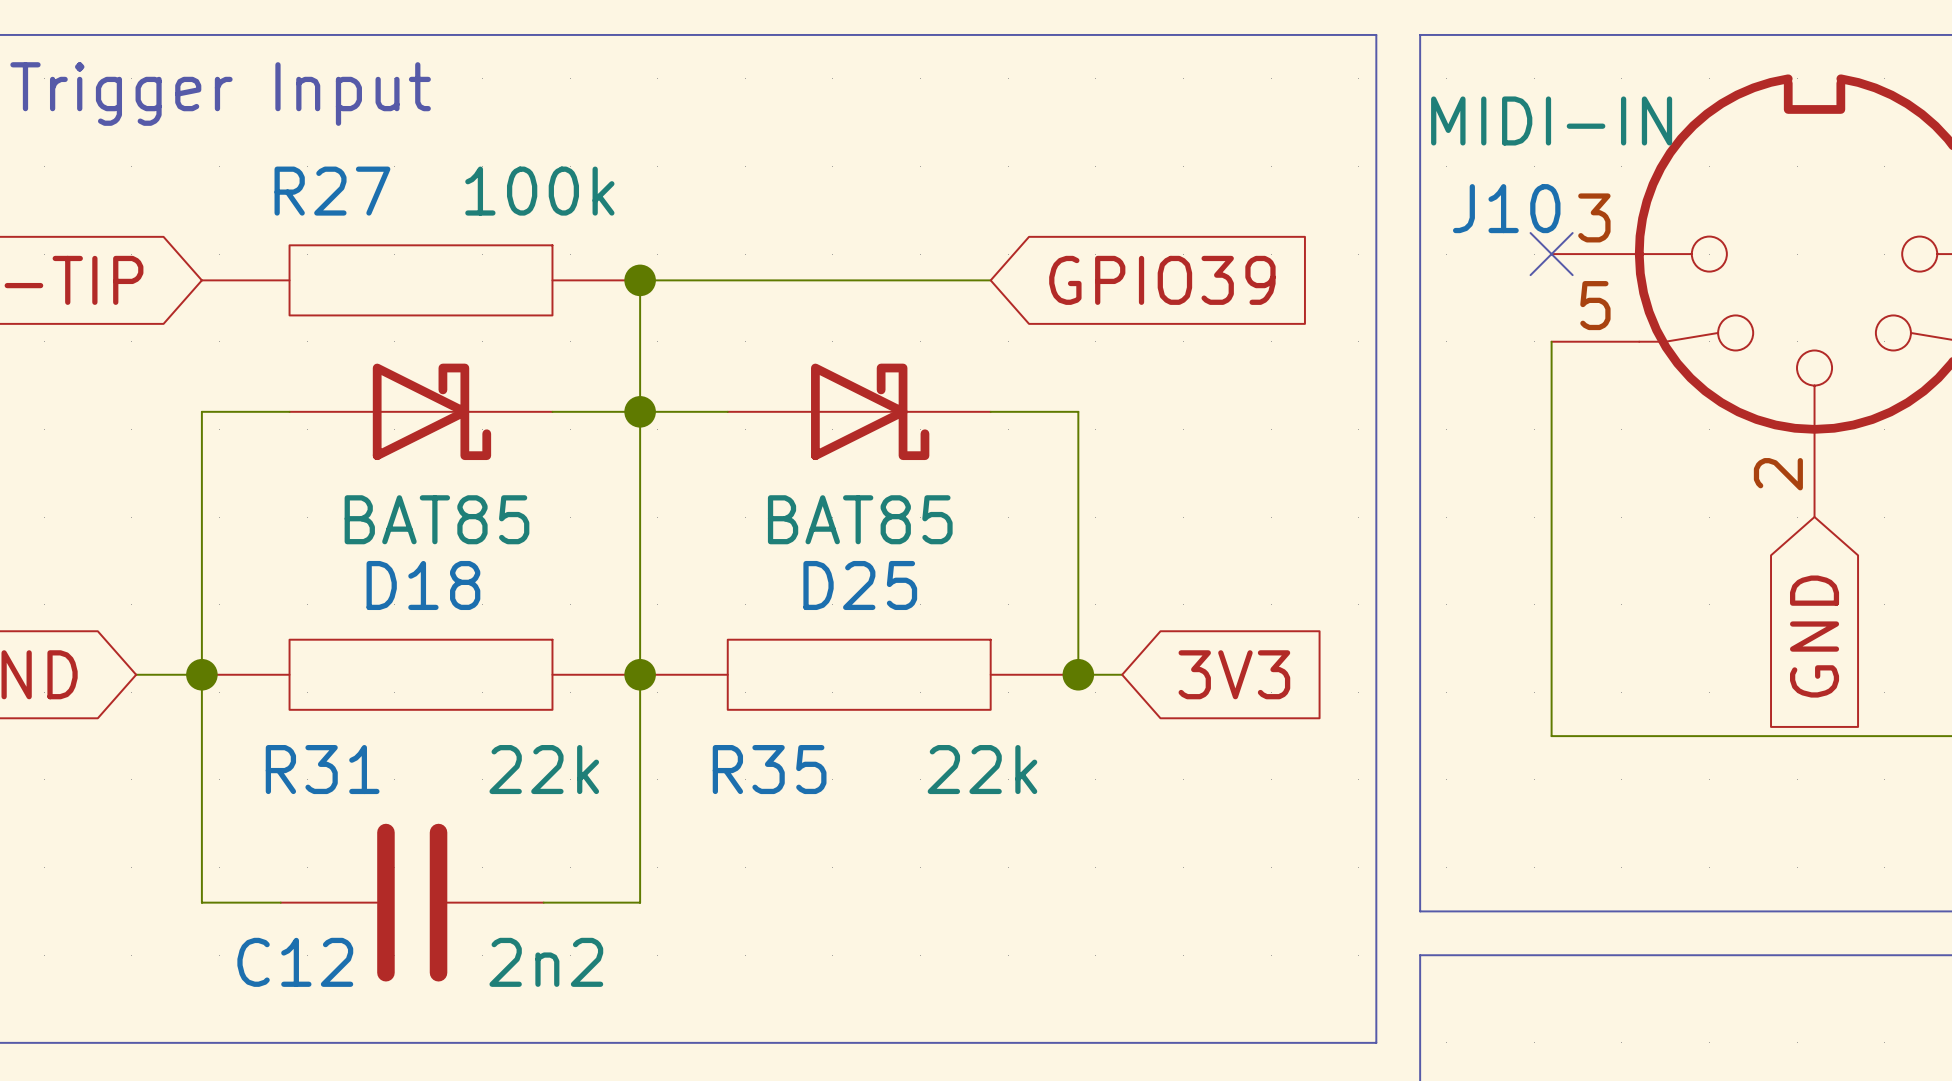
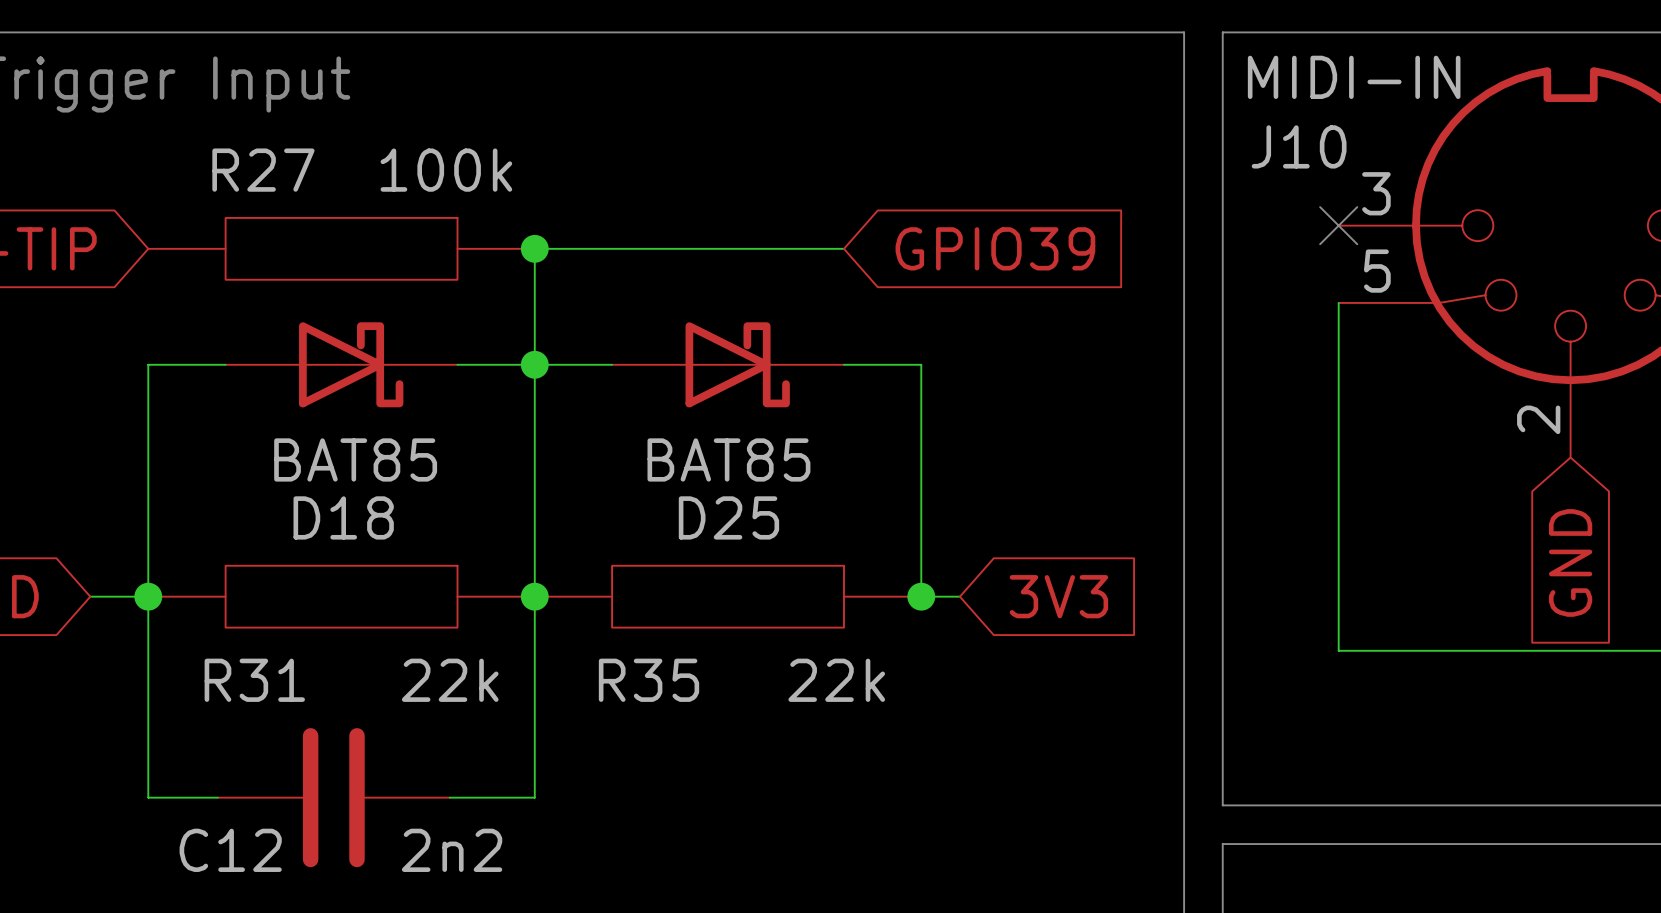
J10 value position: MIDI-IN (1551, 120) -> MIDI-IN (1354, 77)
J10 name position: J10 (1506, 208) -> J10 (1299, 146)

